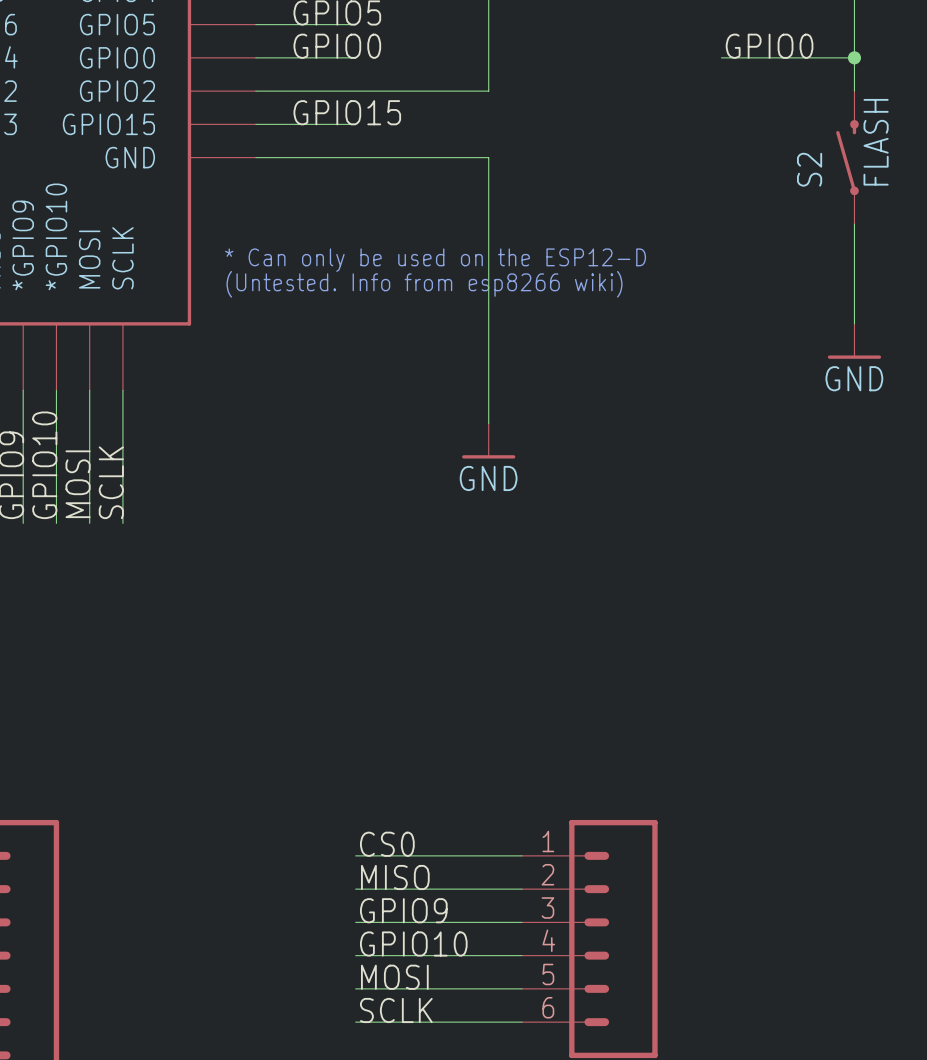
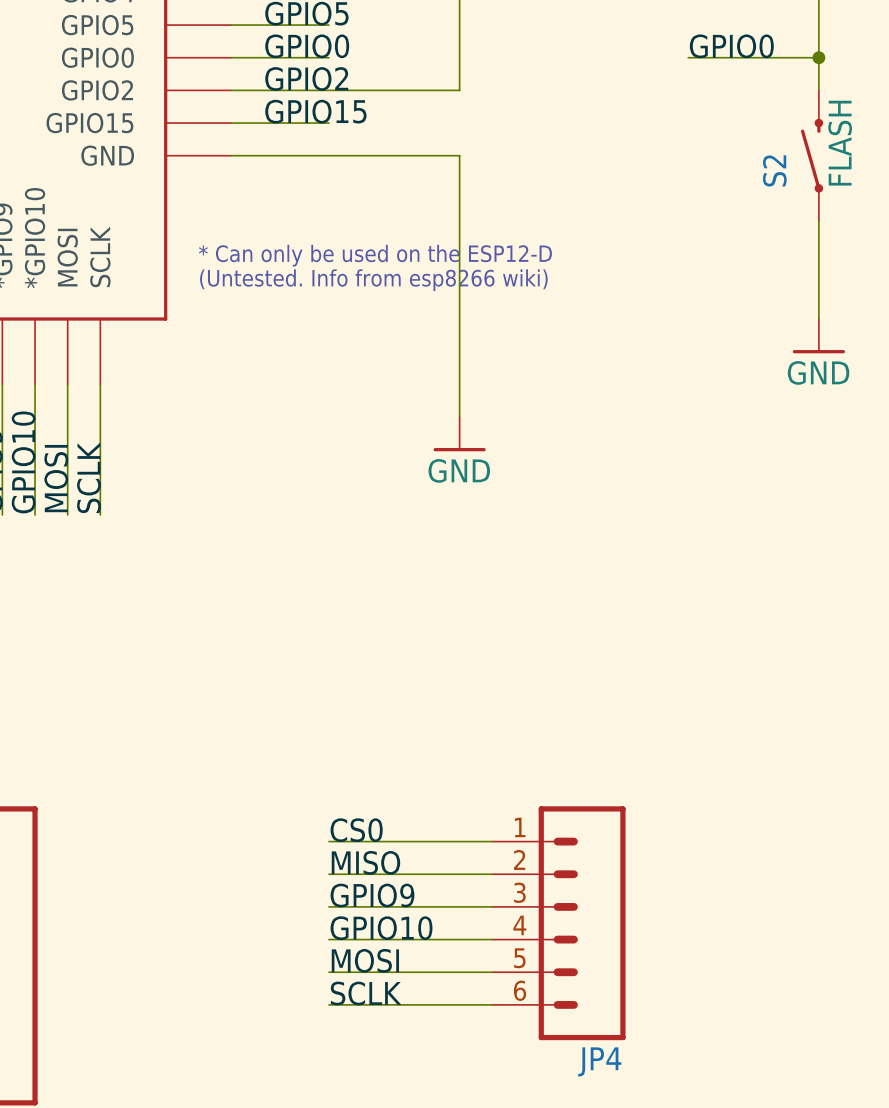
label: none -> GPIO2 (306, 78)

